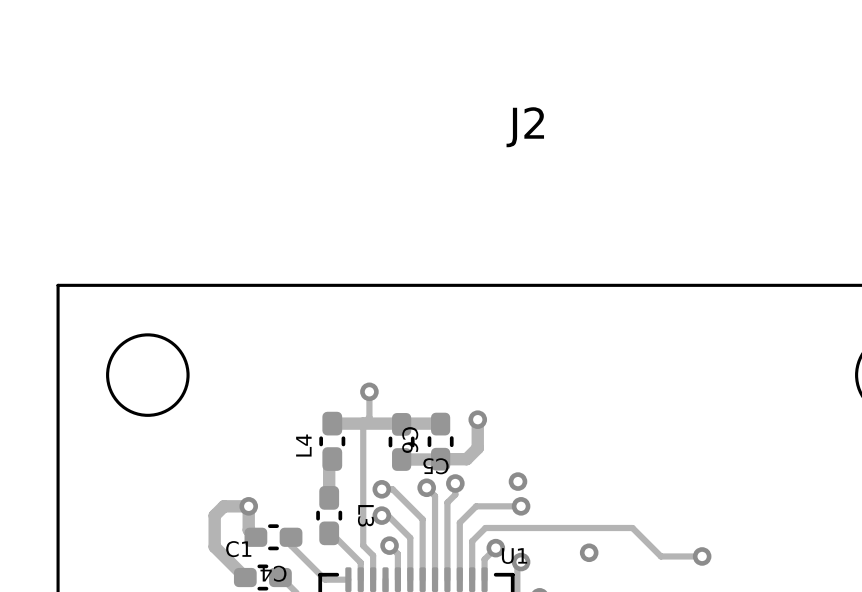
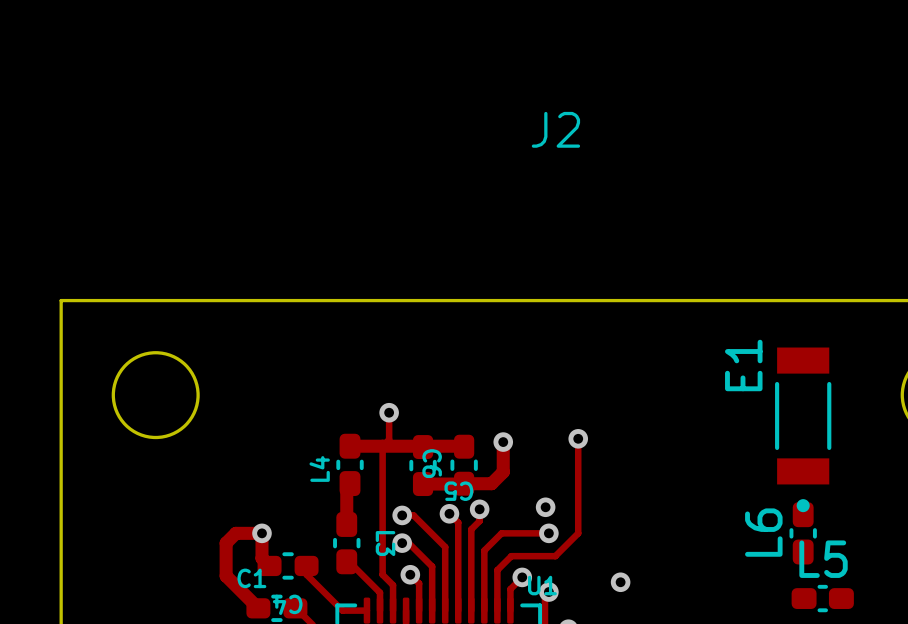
E1: none -> (803, 429)
via: none -> (578, 438)
L6: none -> (803, 533)
track: (527, 527) (632, 527) (660, 556) (702, 556) -> (555, 556) (578, 533) (578, 438)
via: (702, 556) -> none
L5: none -> (822, 598)

